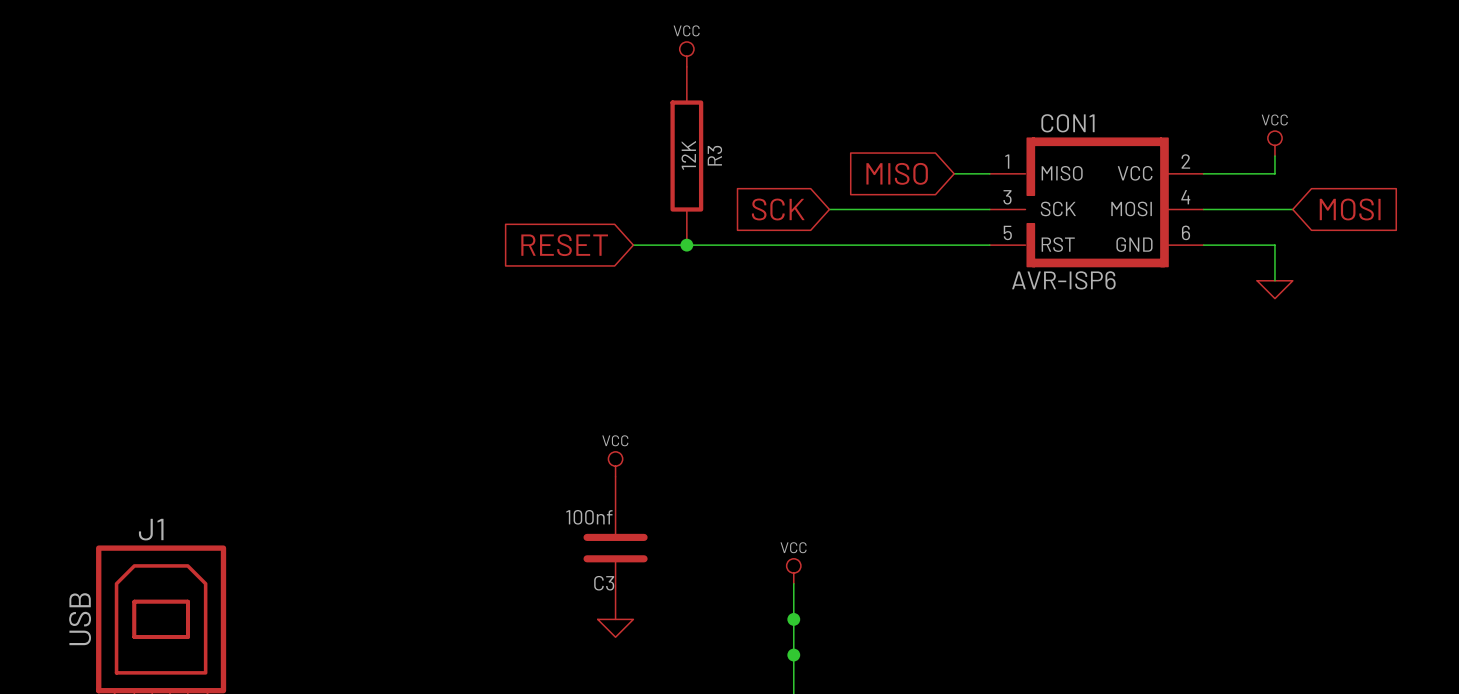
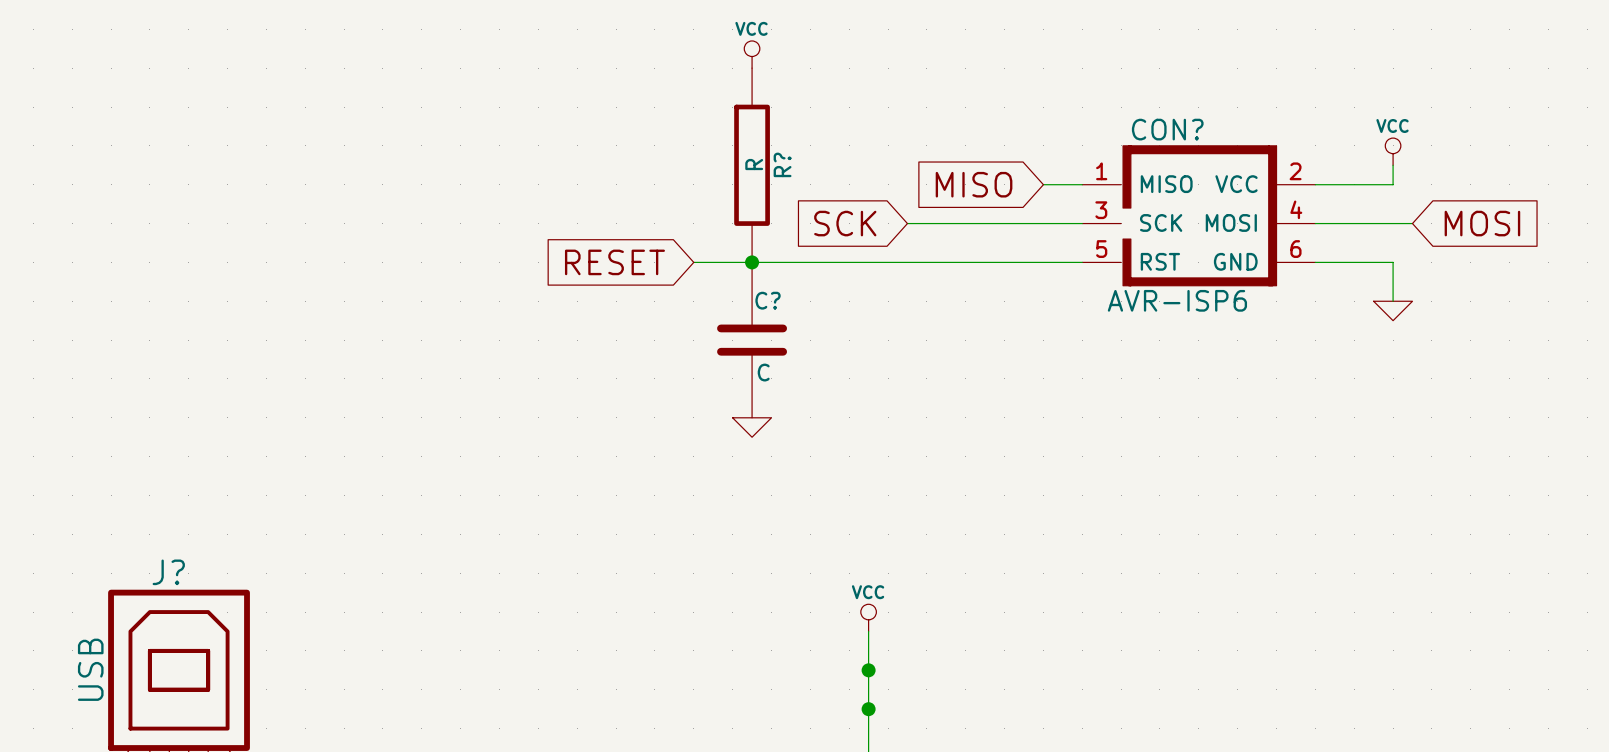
CON1 name: CON1 (1067, 123) -> CON? (1167, 129)
R3 value: 12K (688, 155) -> R (754, 164)
R3 name: R3 (714, 155) -> R? (782, 164)
C?: none -> C (752, 340)
power symbol: VCC (615, 464) -> none
J1 name: J1 (151, 529) -> J? (168, 572)
C3: 100nf (615, 548) -> none
power symbol position: (615, 628) -> (752, 427)

